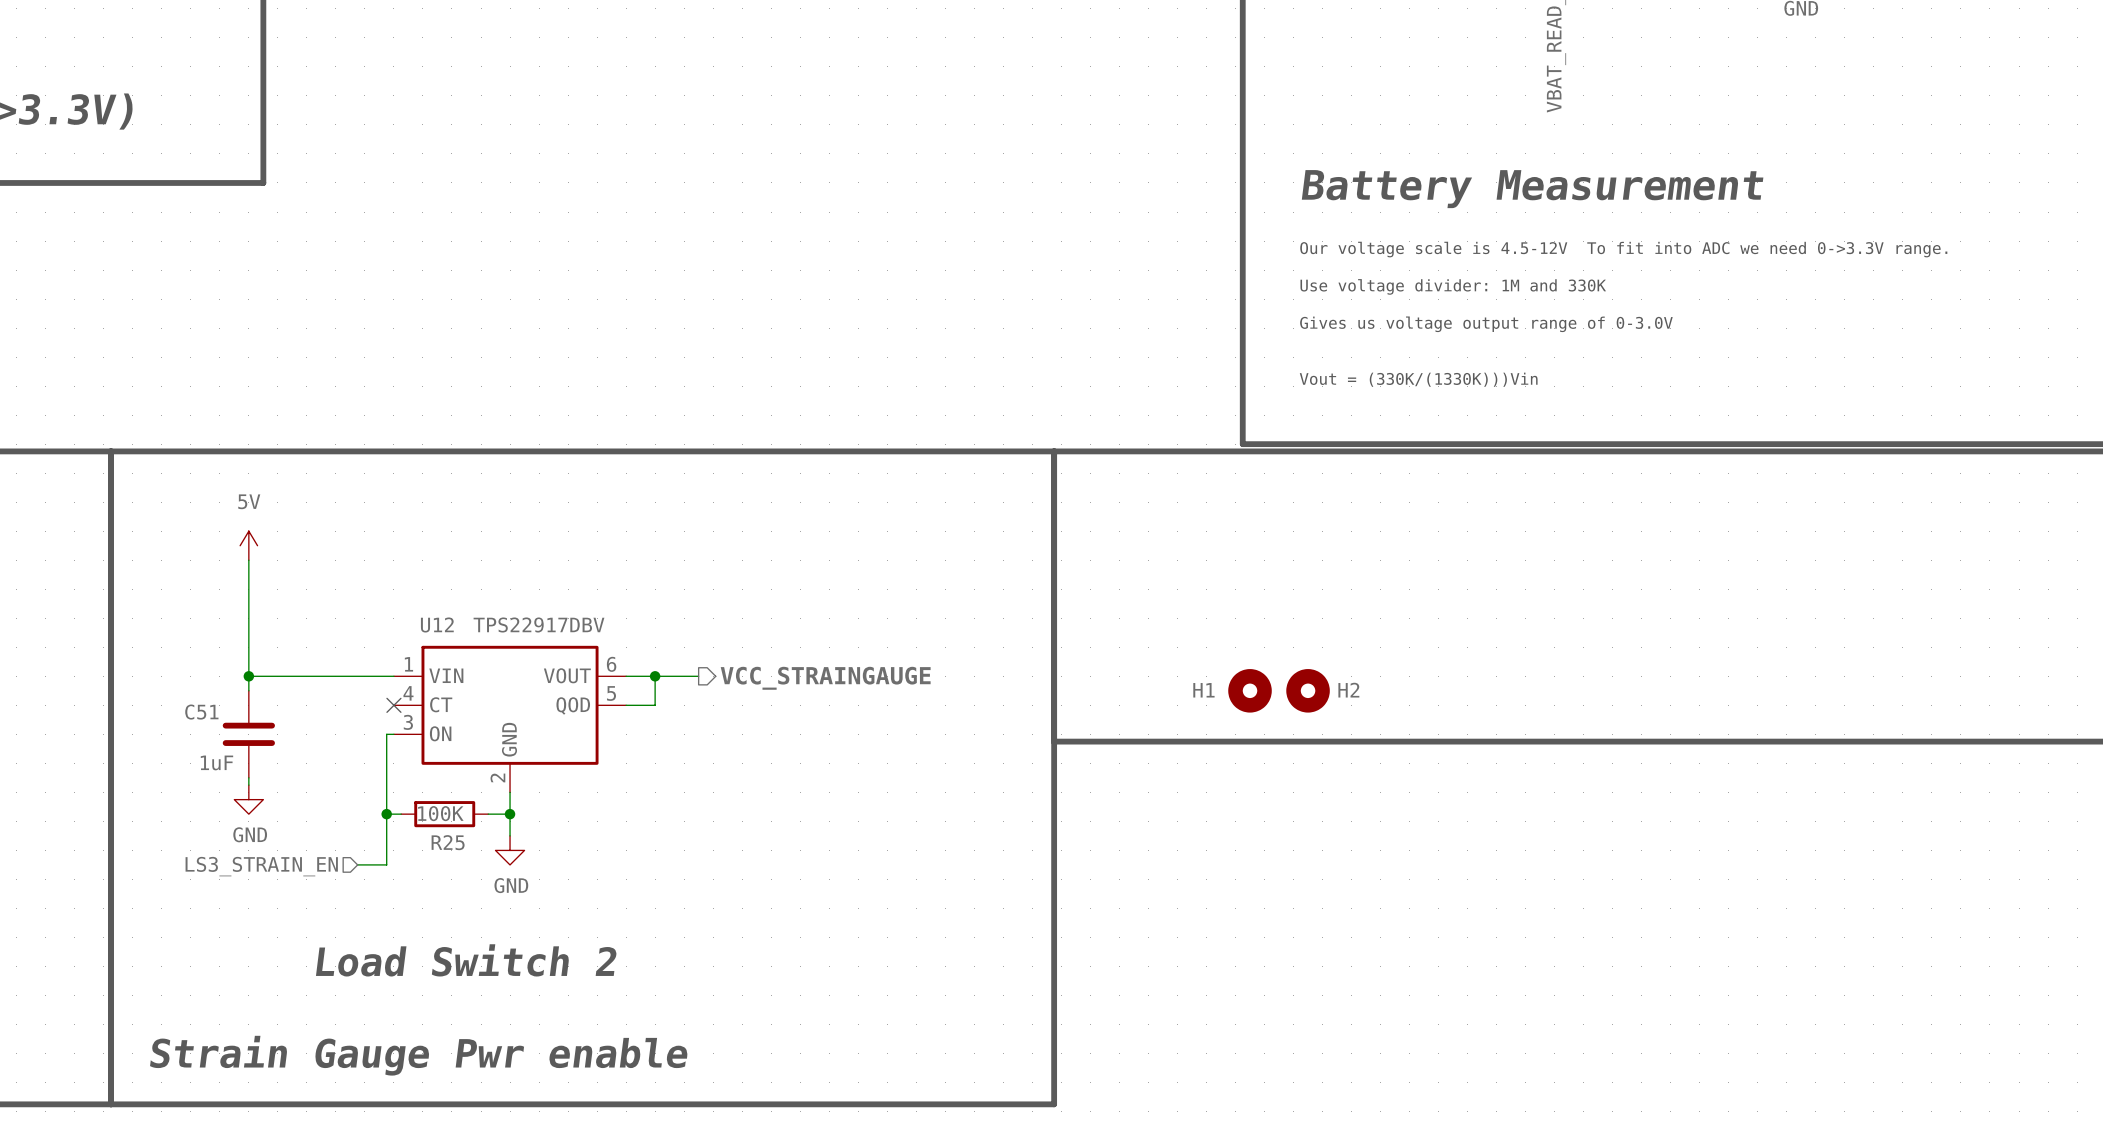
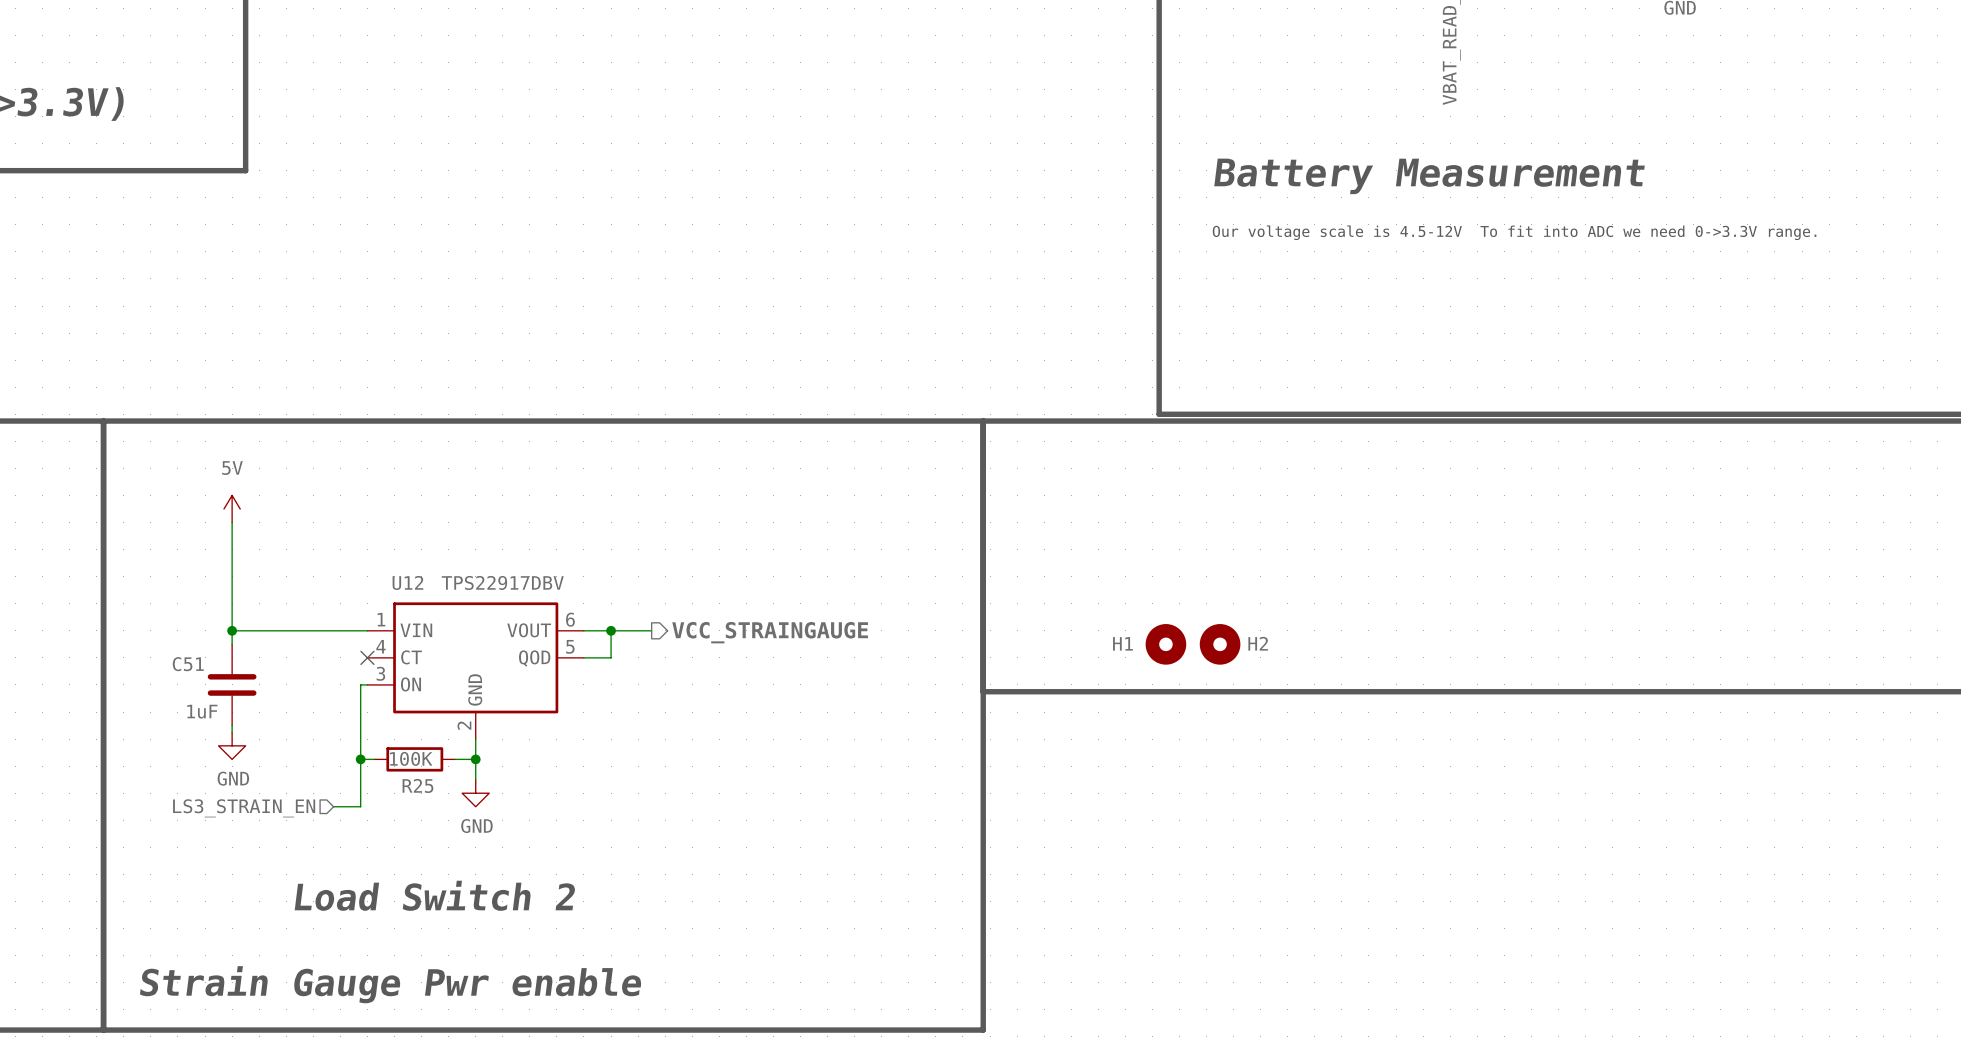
text: Use voltage divider: 1M and 330K (1453, 286) -> none
text: Gives us voltage output range of 0-3.0V (1486, 324) -> none
text: Vout = (330K/(1330K)))Vin (1418, 379) -> none

